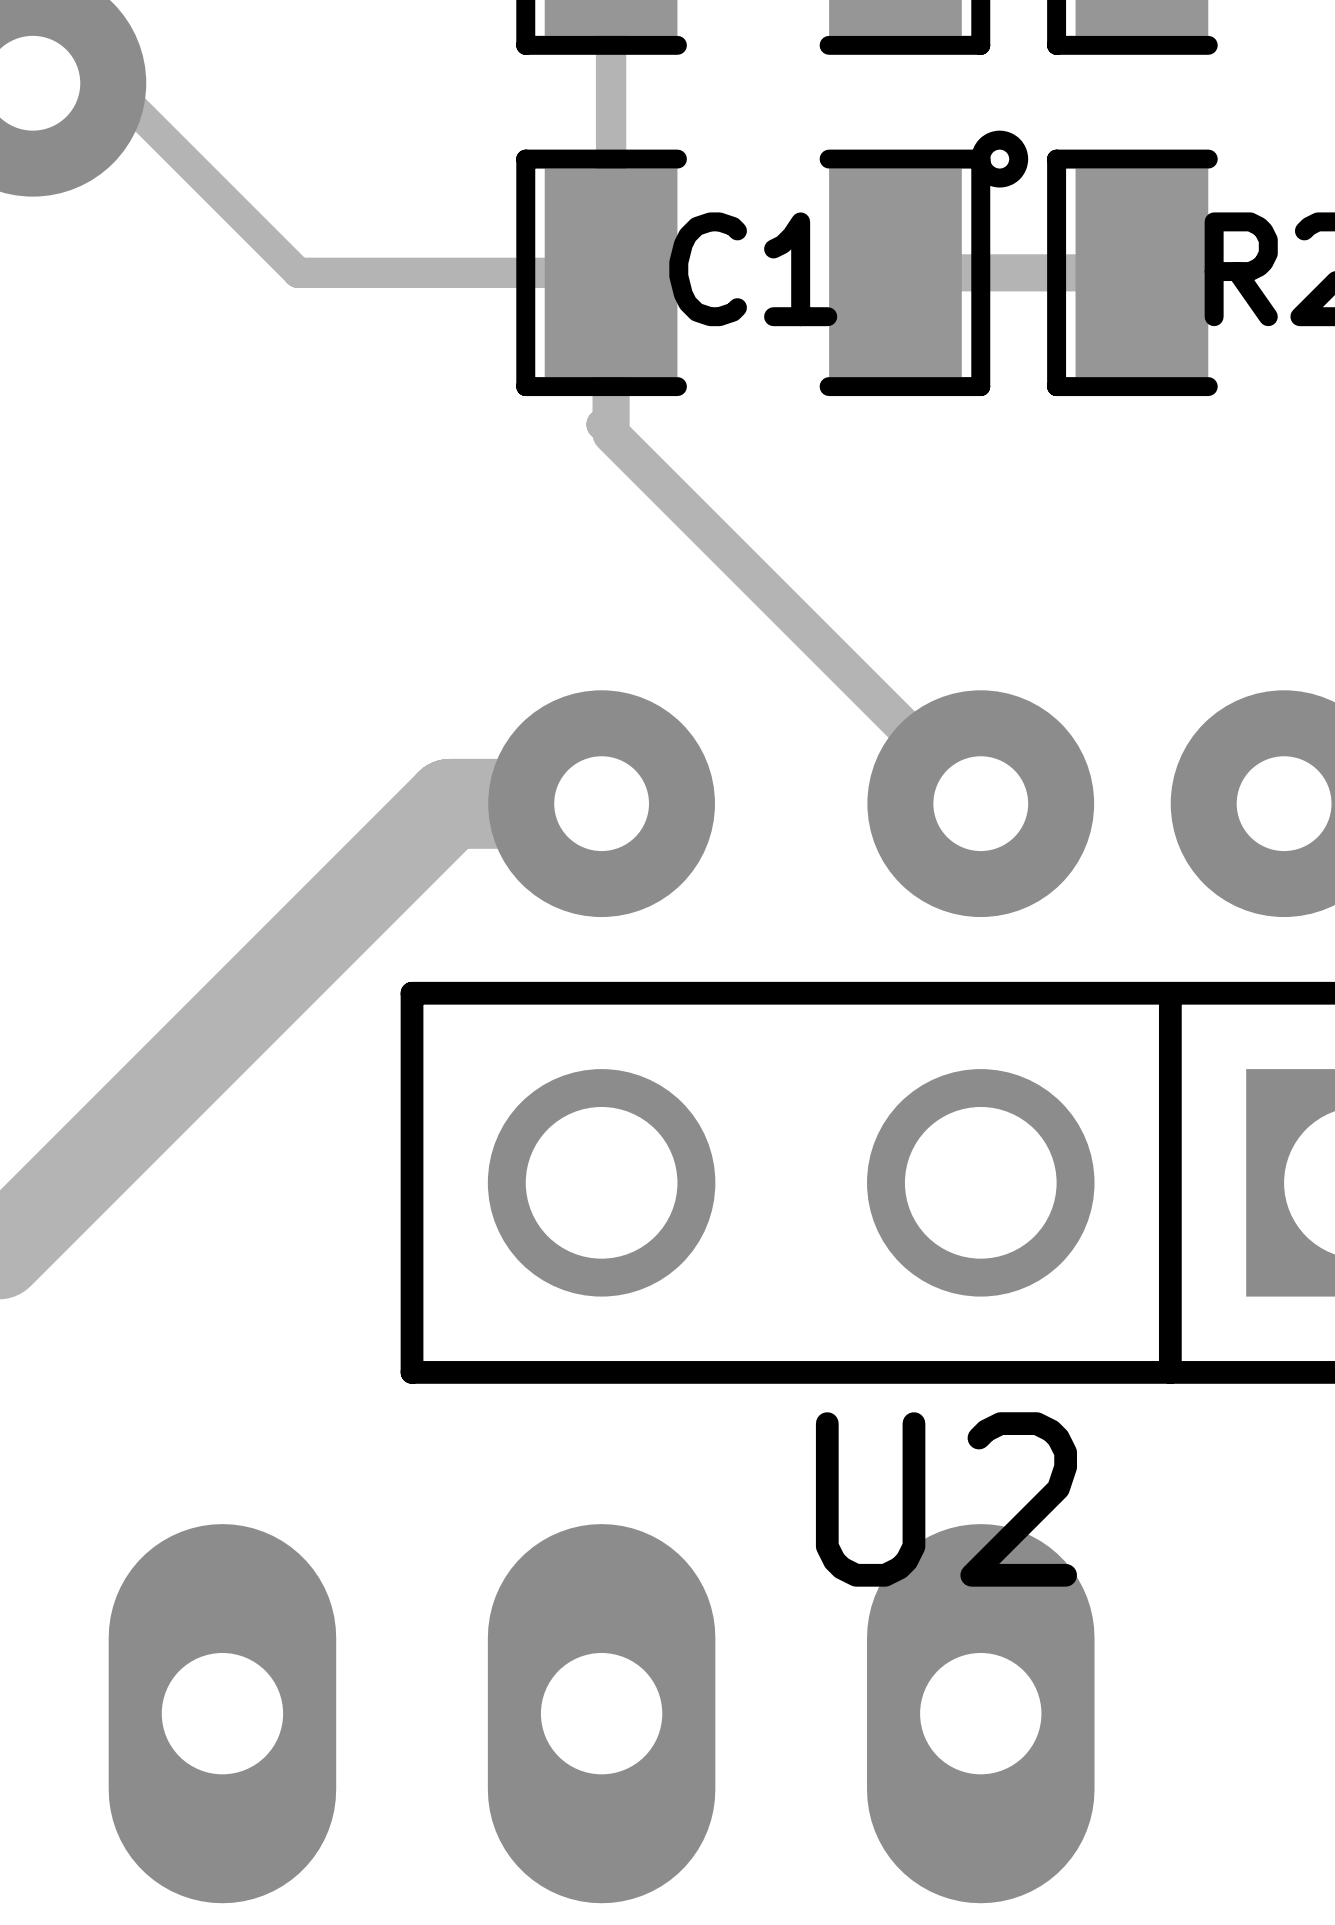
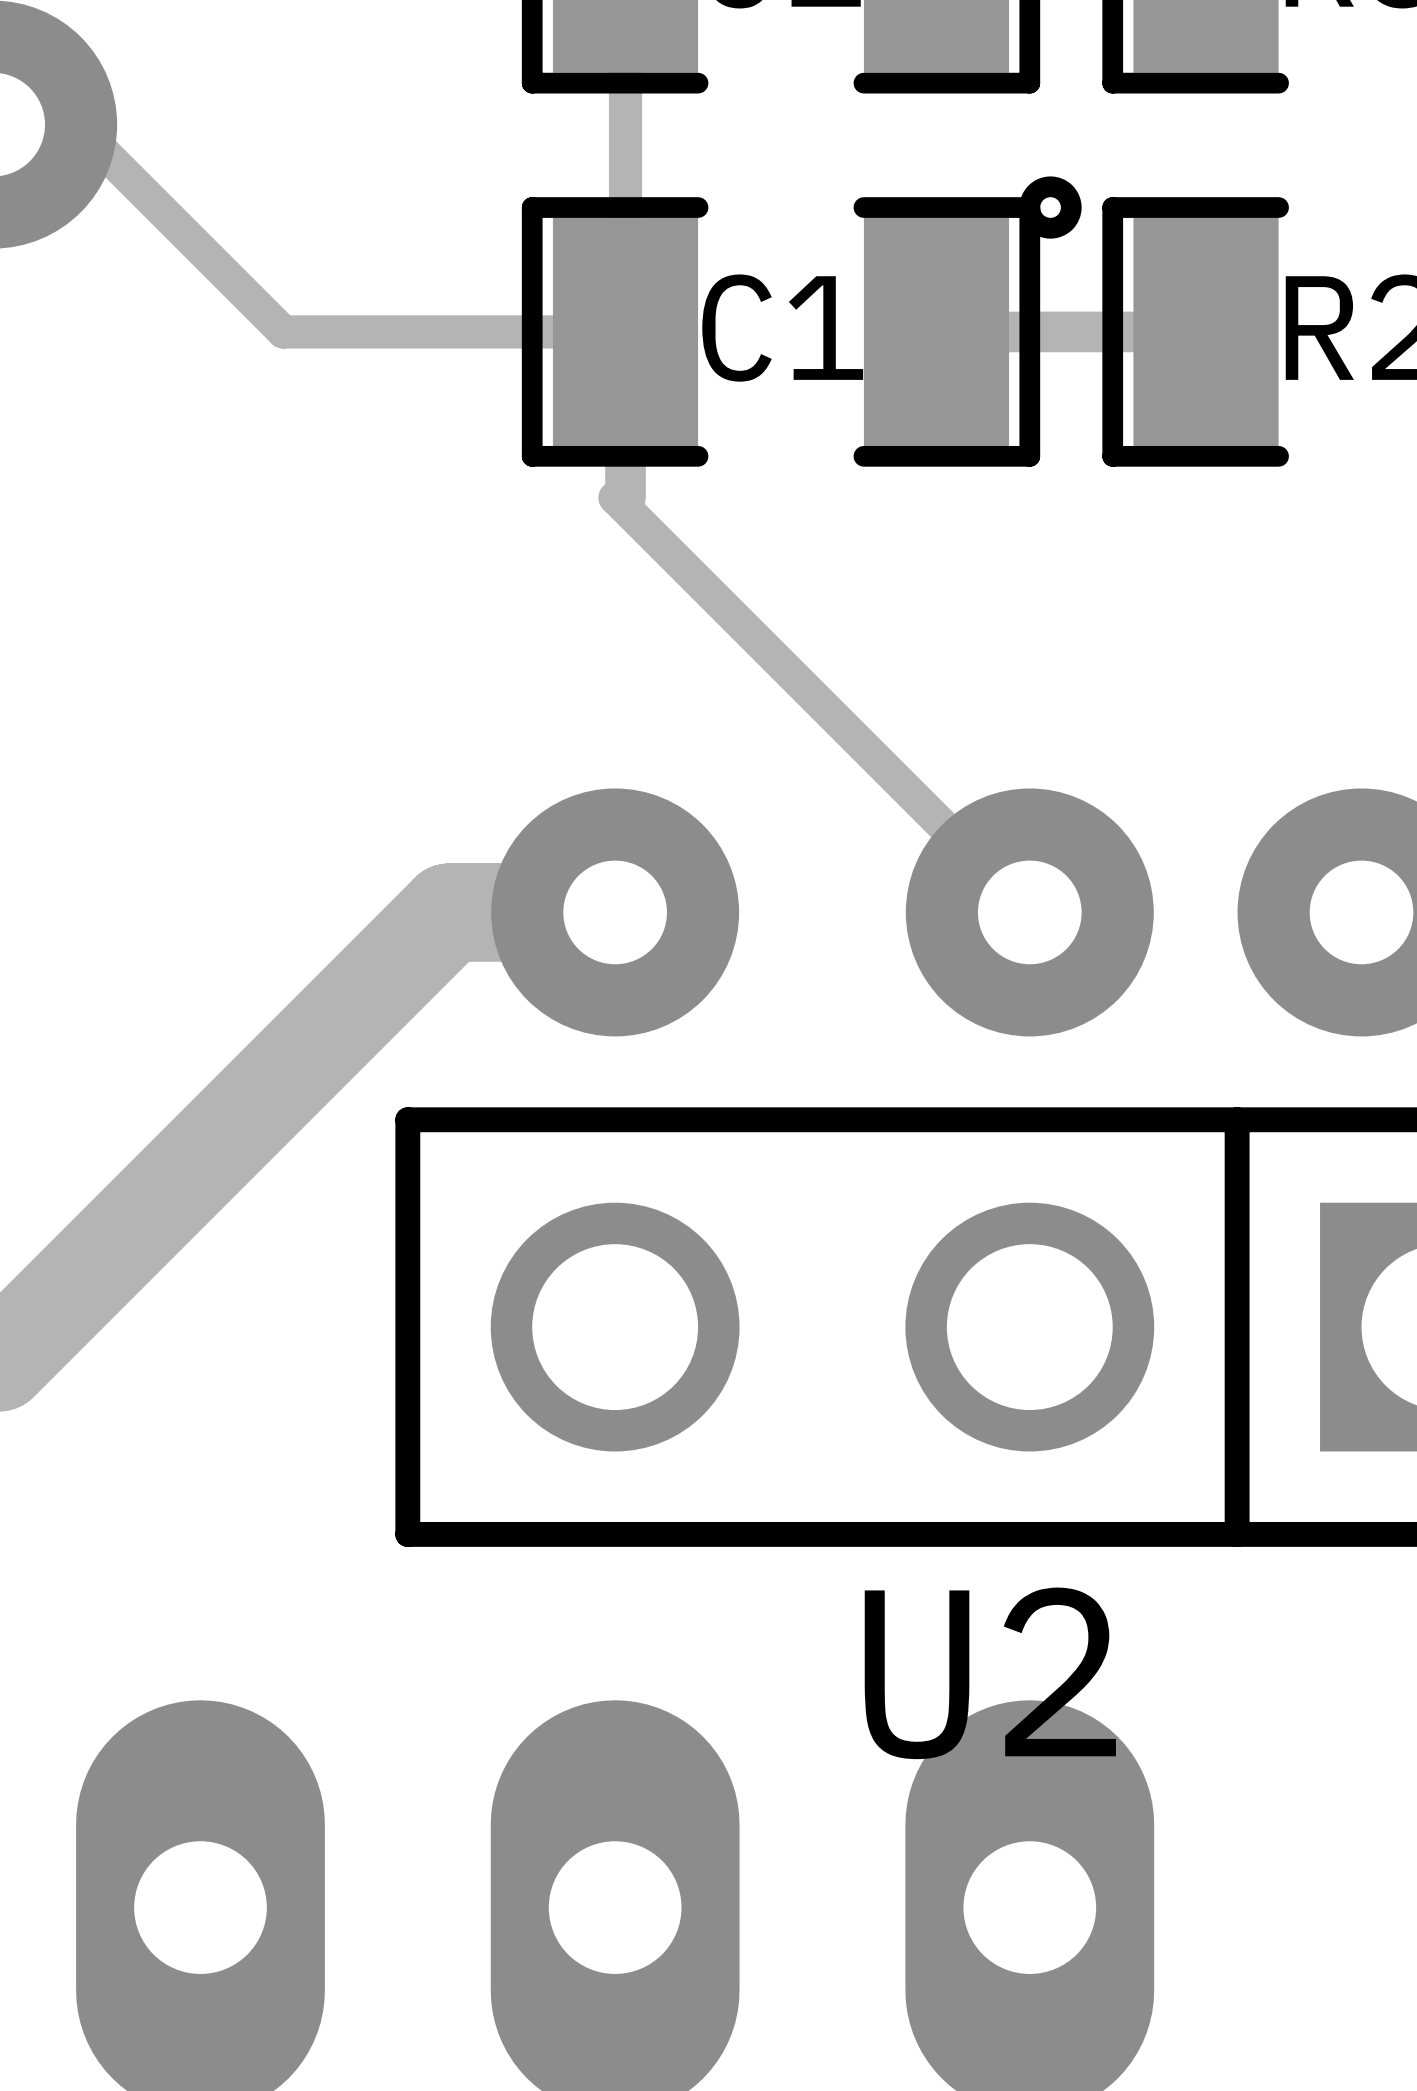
track width: thick (611, 433) (980, 803) -> thin (625, 508) (1029, 912)

